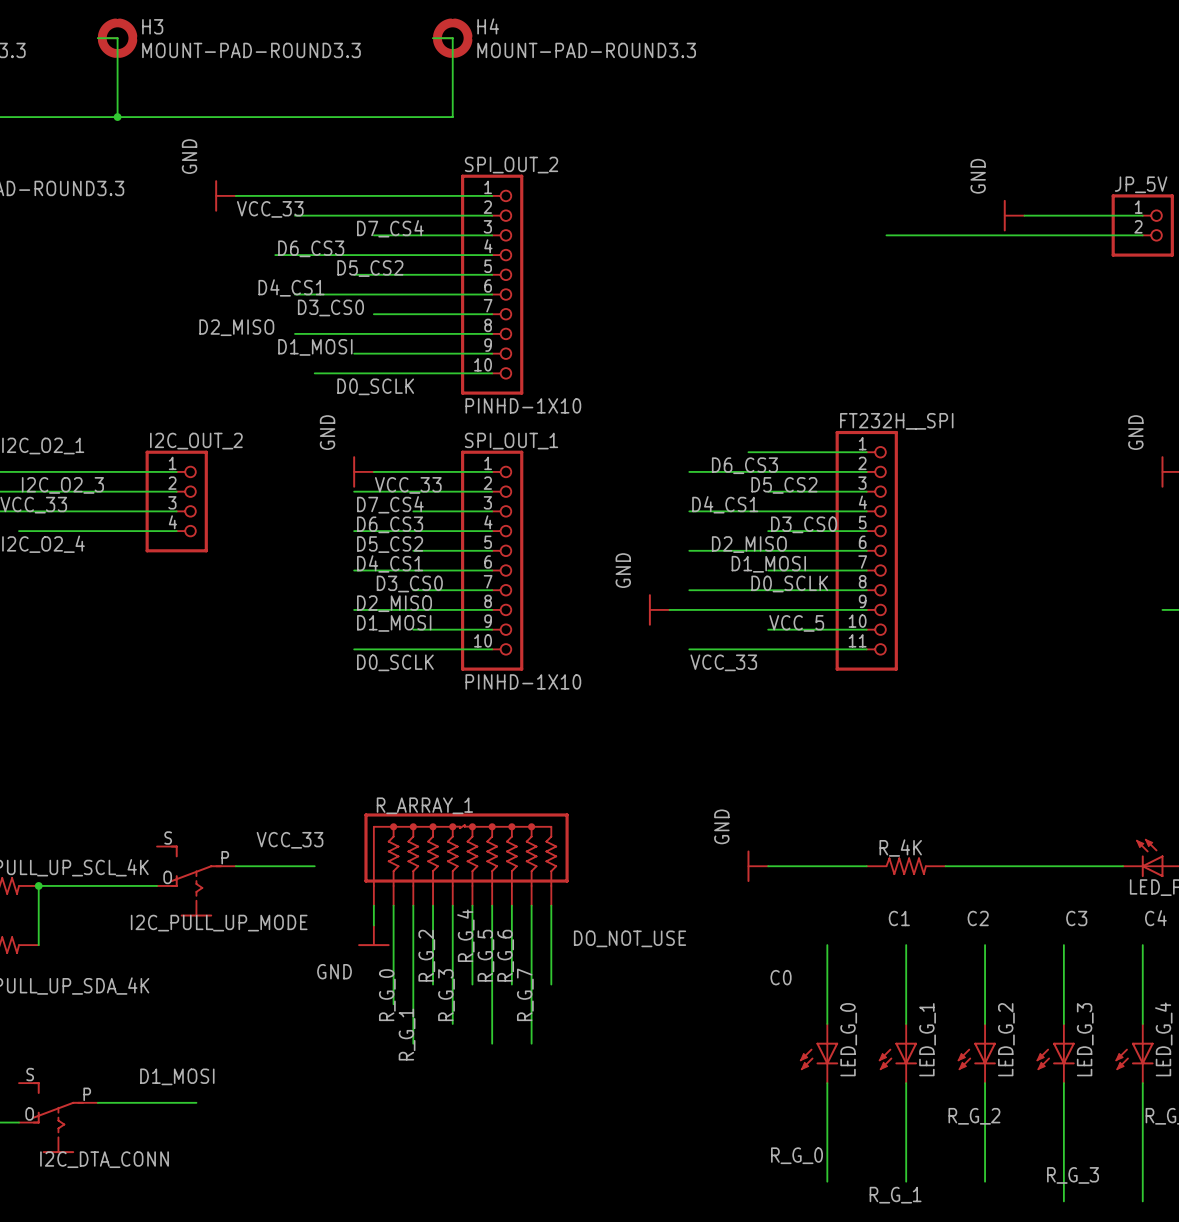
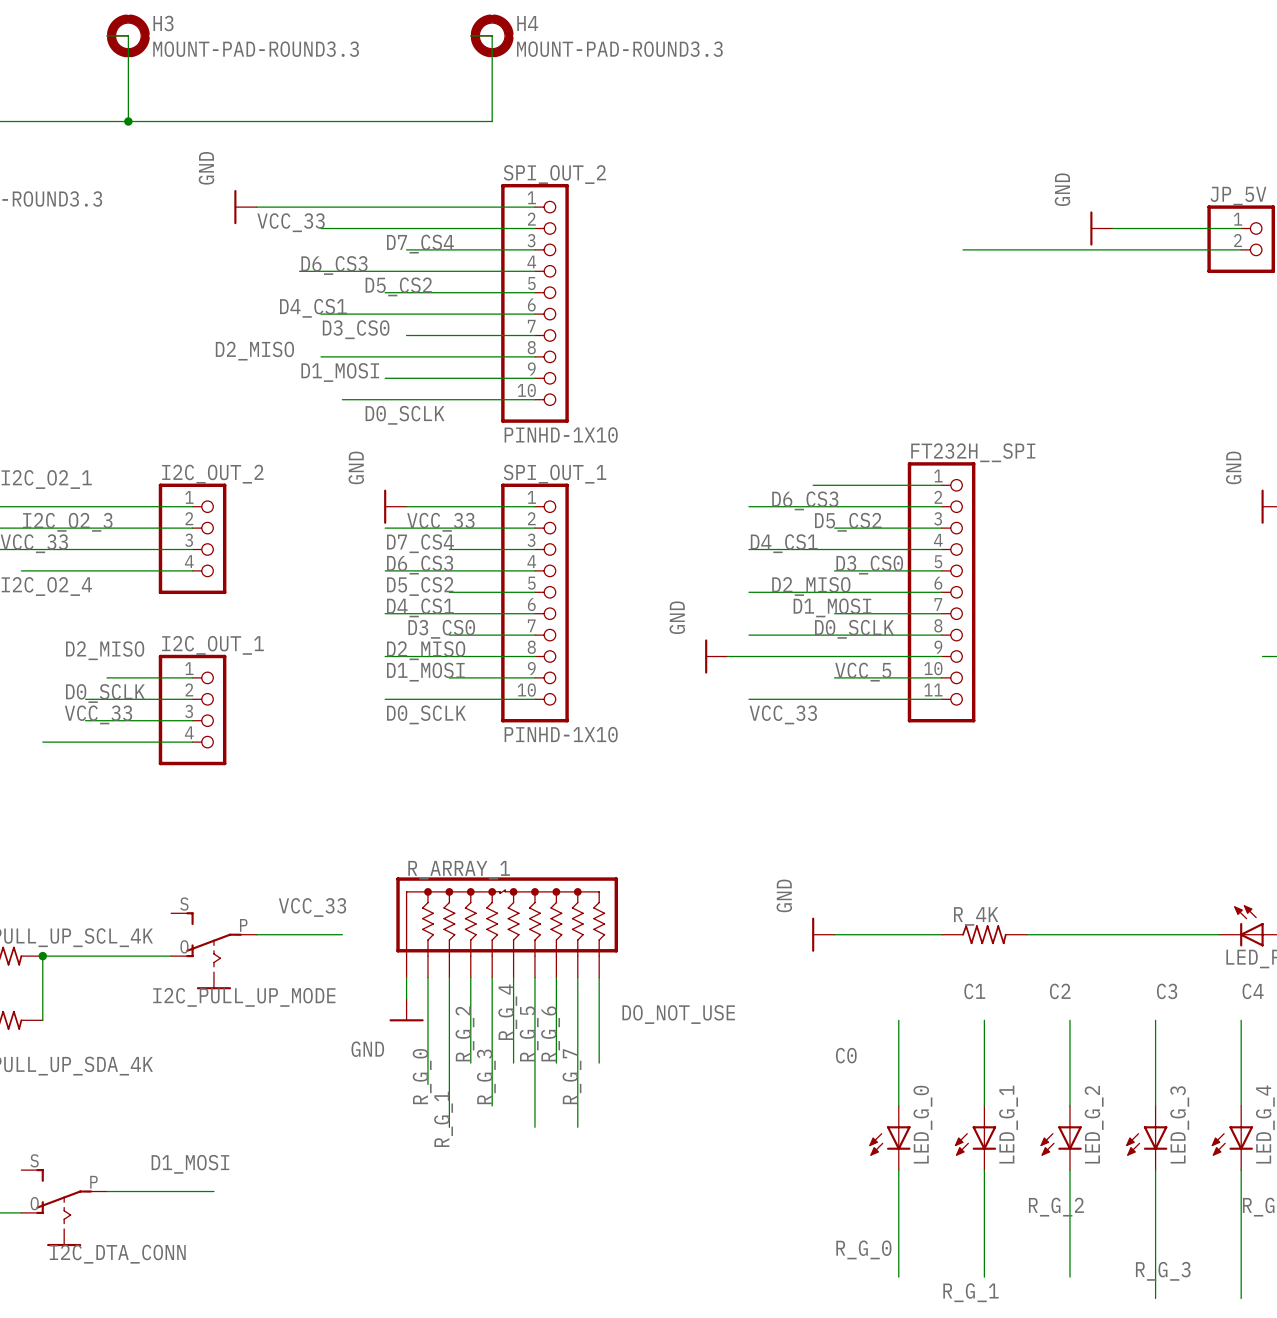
label: none -> D2_MISO (105, 650)
wire: none -> (106, 677) (192, 677)
label: none -> D0_SCLK (105, 693)
wire: none -> (85, 699) (192, 699)
I2C_OUT_1: none -> (192, 710)
label: none -> VCC_33 (98, 714)
wire: none -> (85, 720) (192, 720)
wire: none -> (42, 742) (192, 742)

